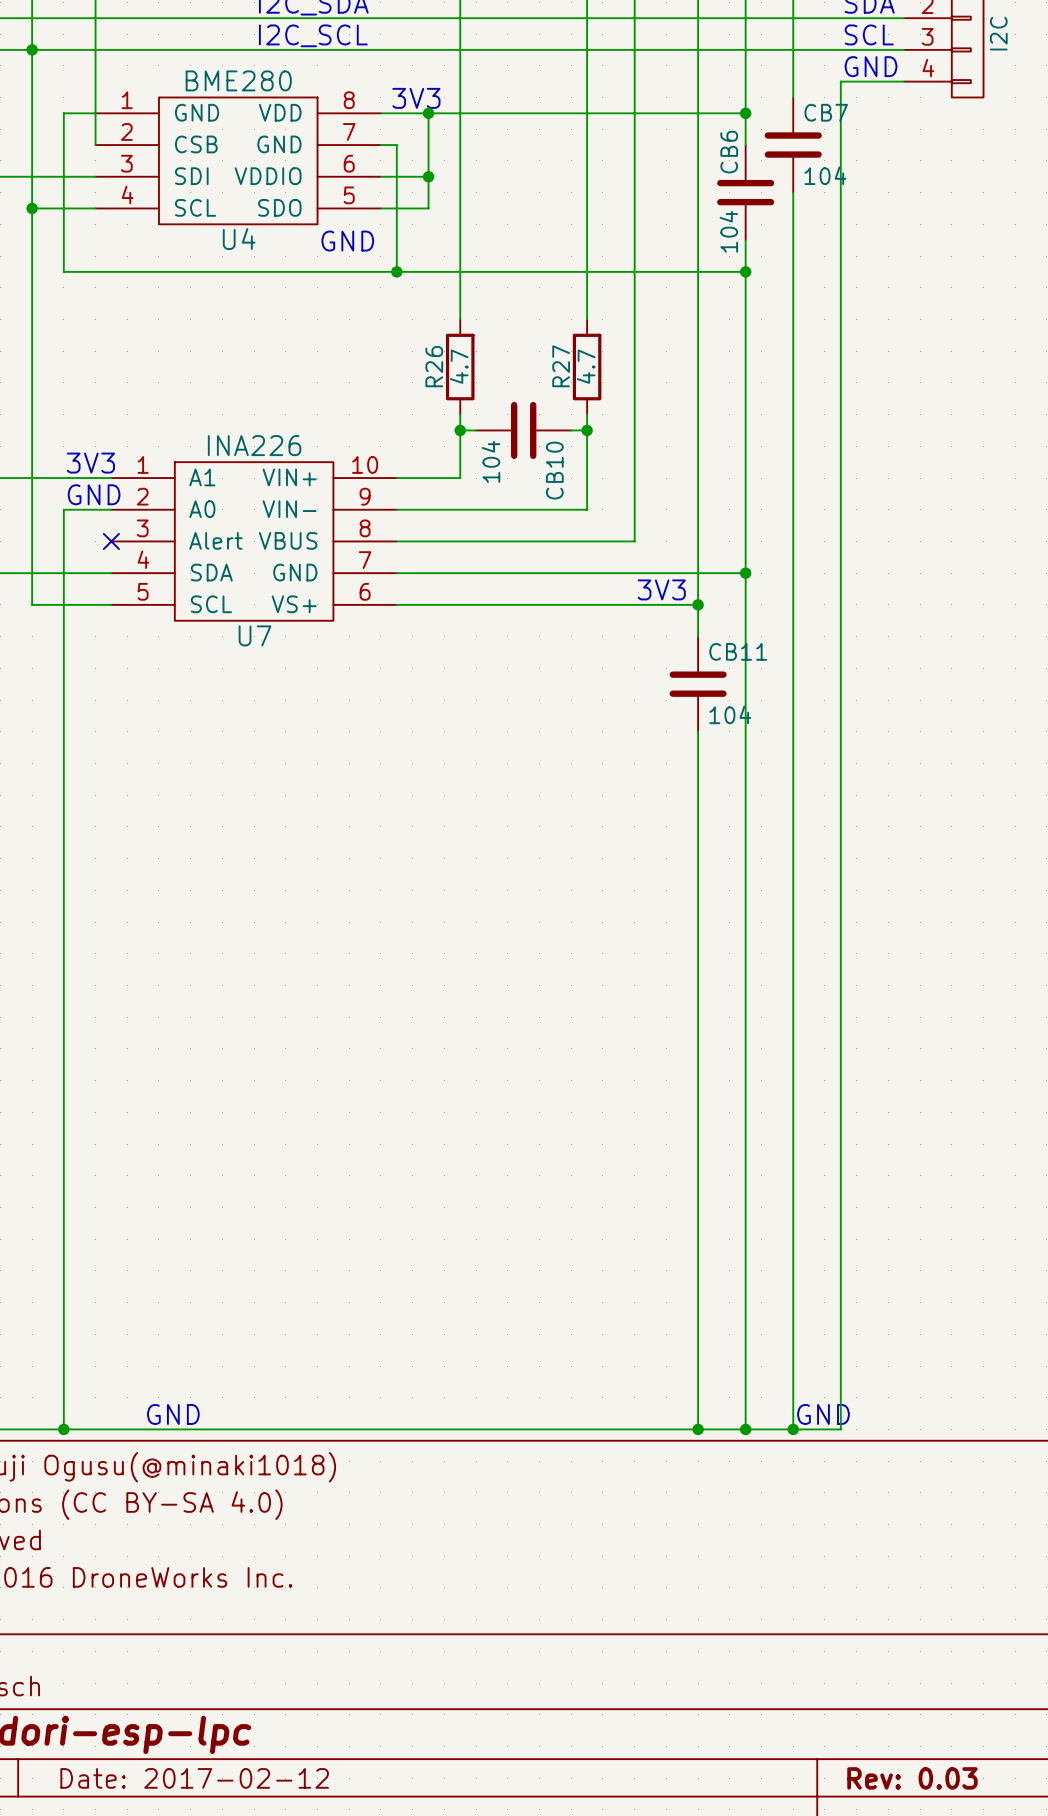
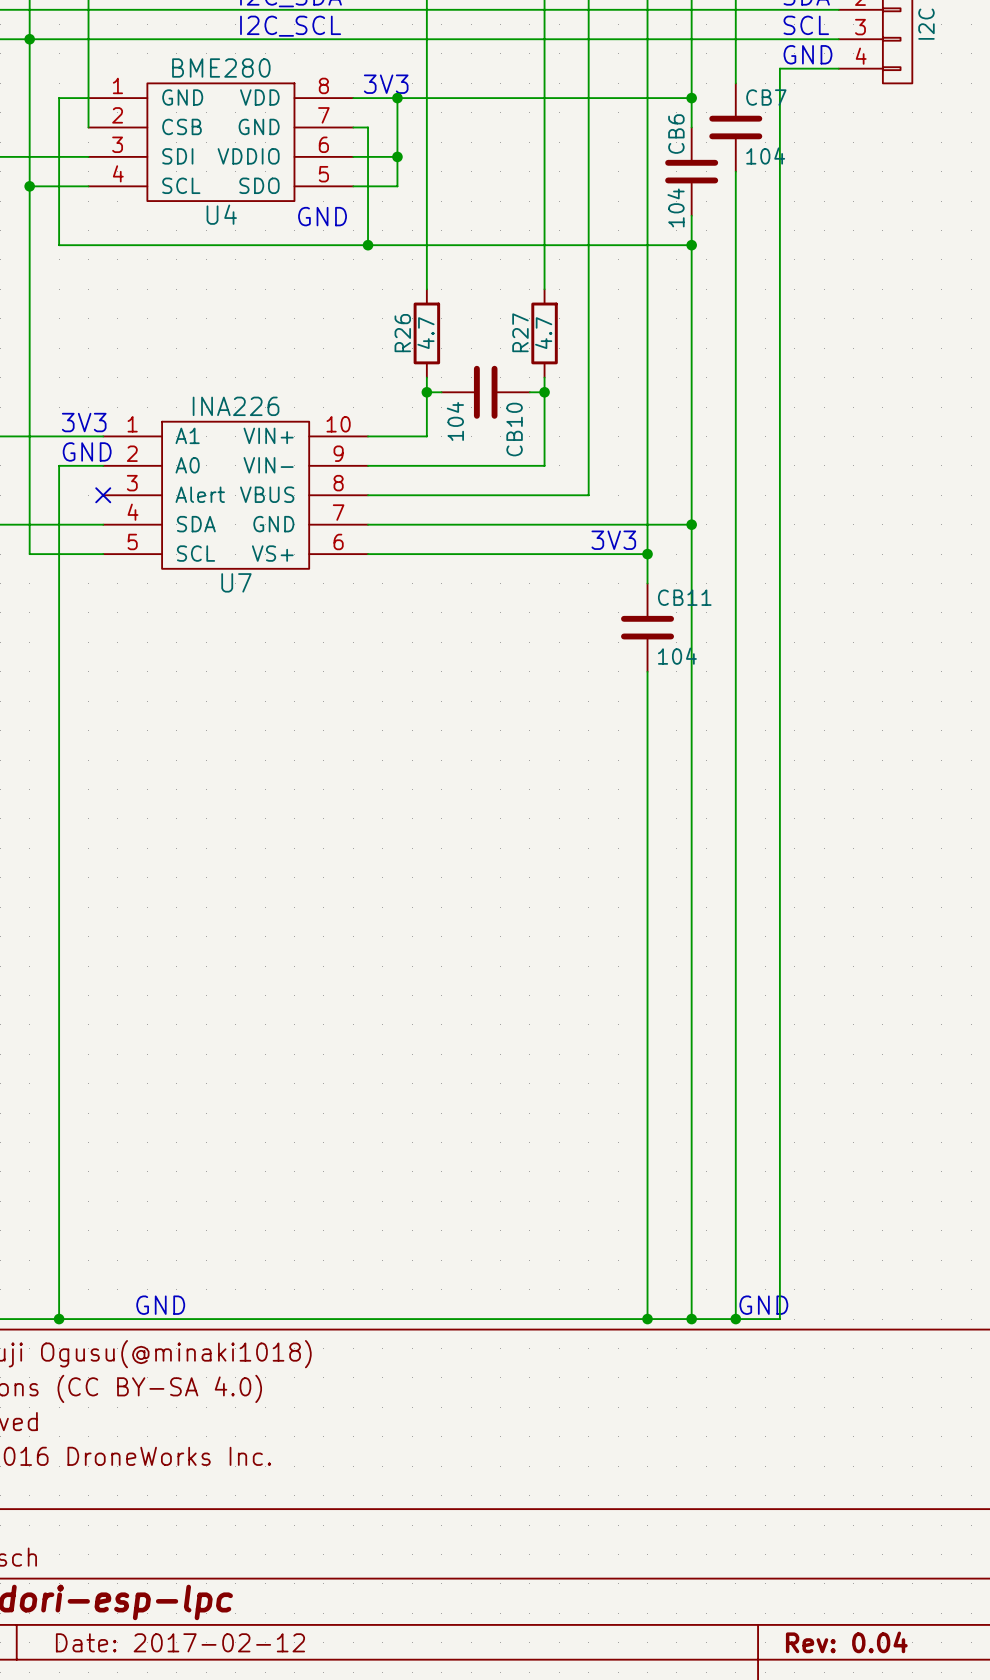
title block: Rev: 0.03 (912, 1778) -> Rev: 0.04 (846, 1642)

